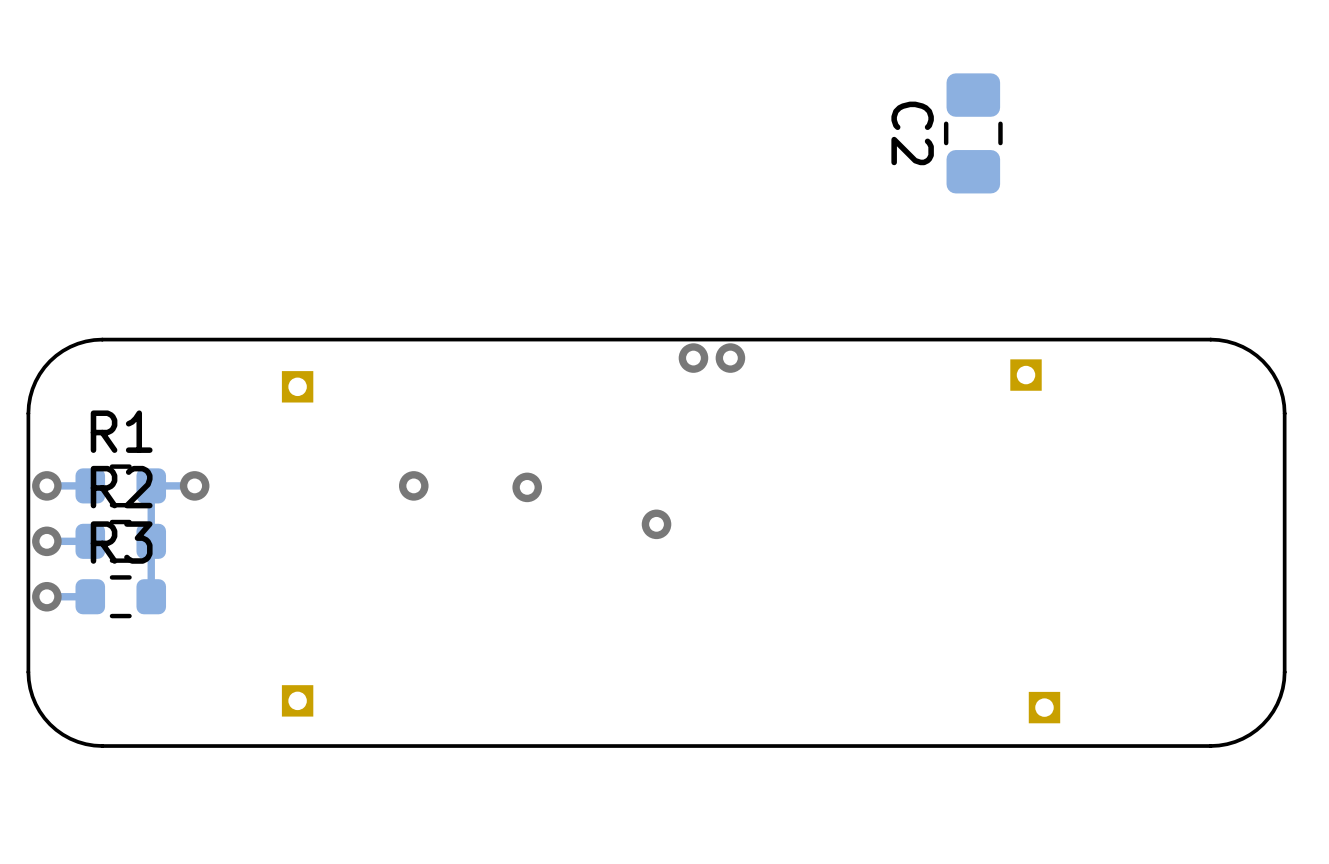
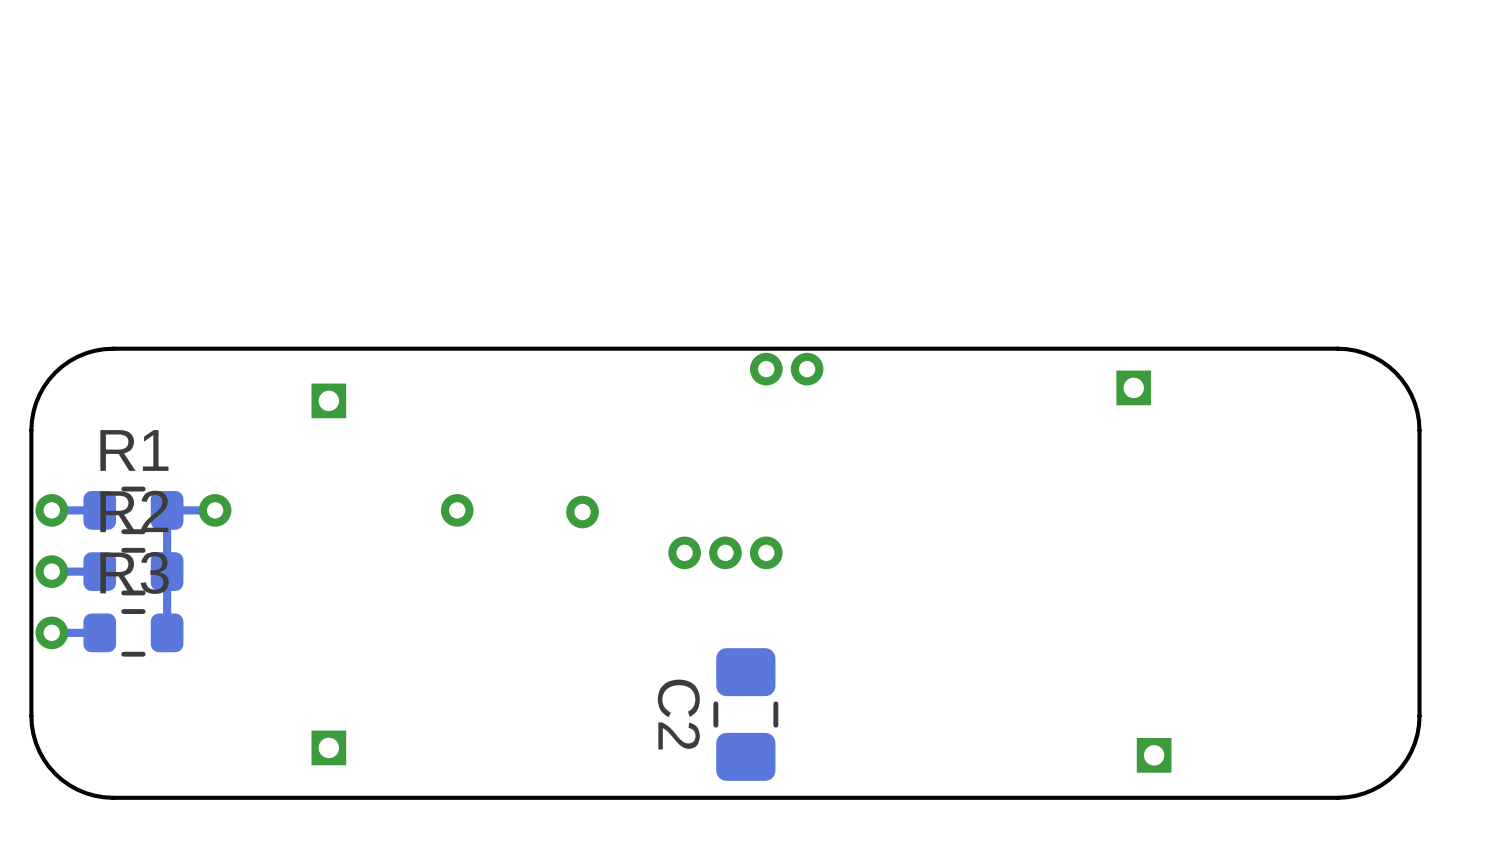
C2 position: (973, 133) -> (745, 714)
via: none -> (684, 552)
via: none -> (766, 552)

